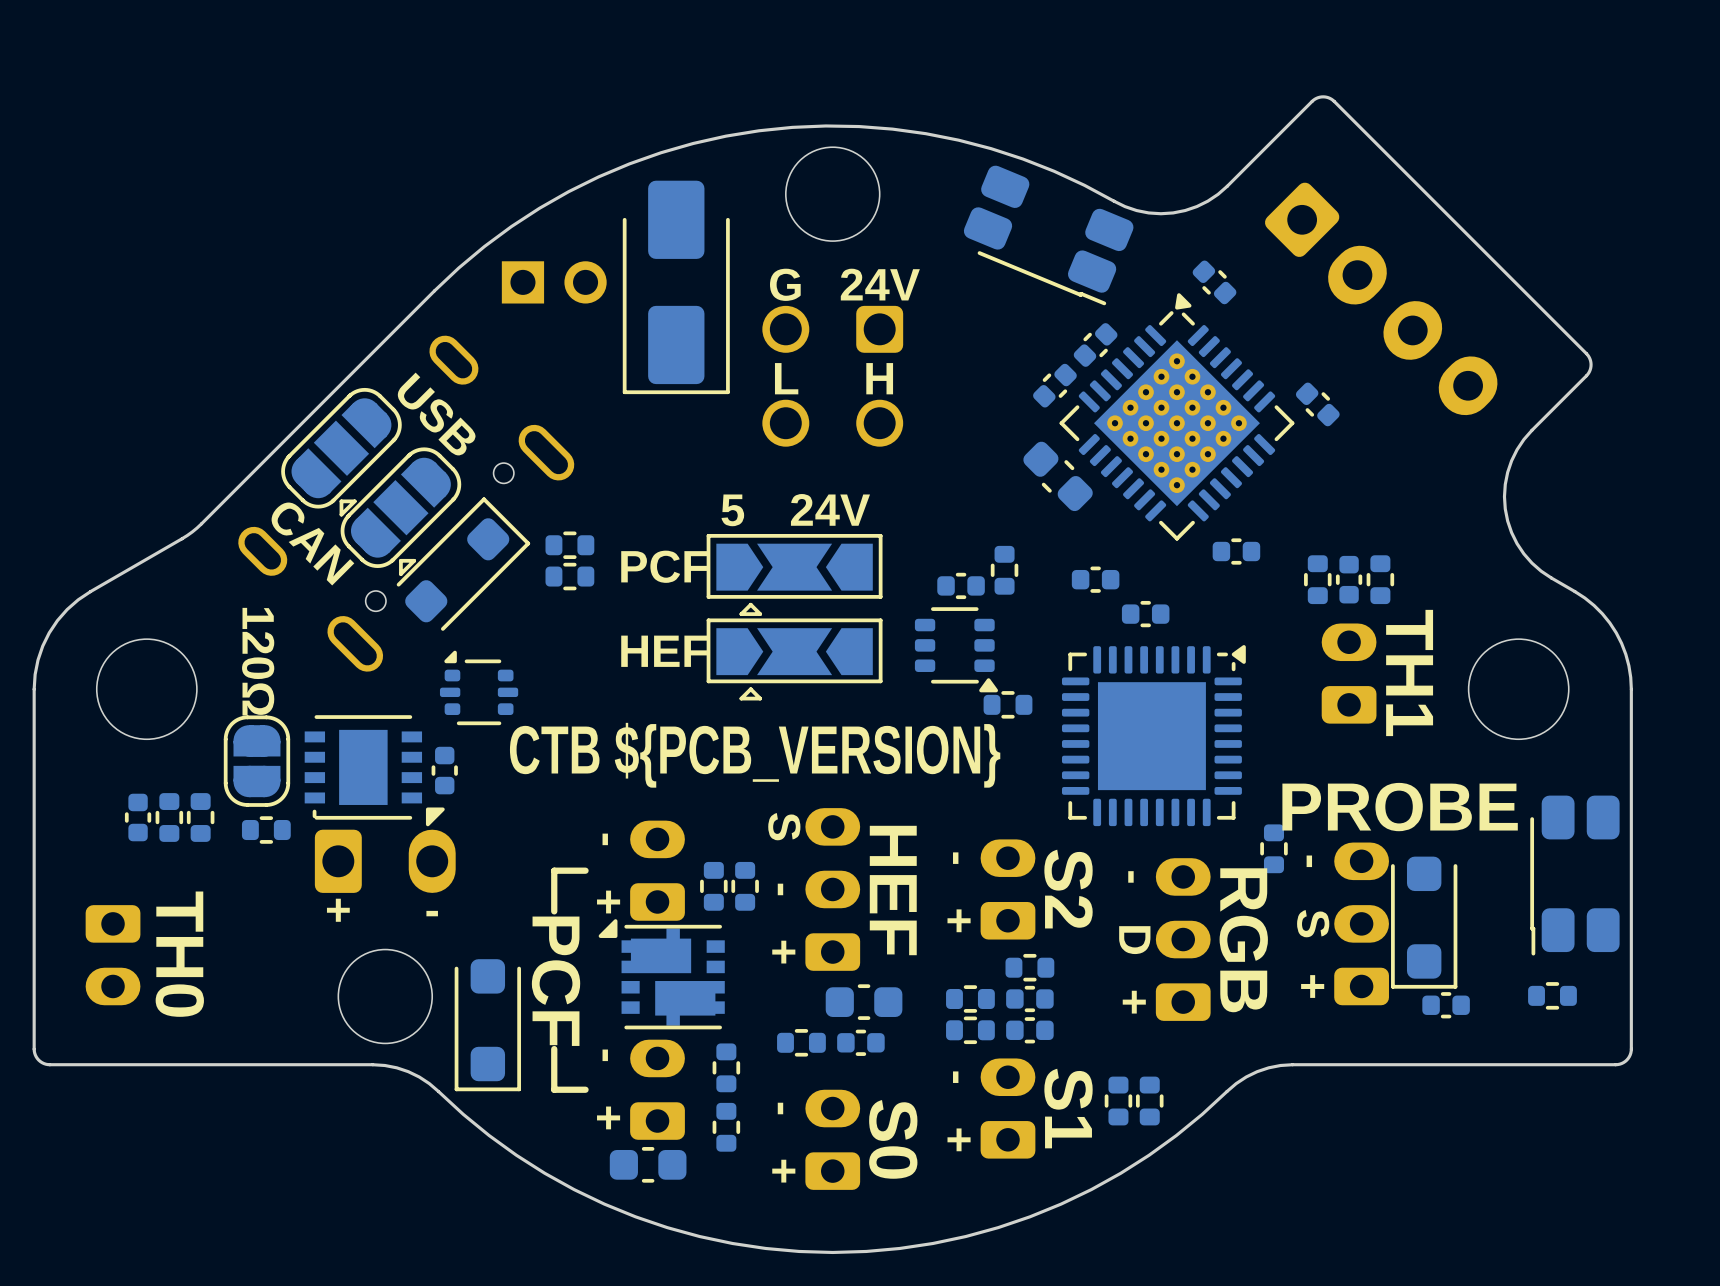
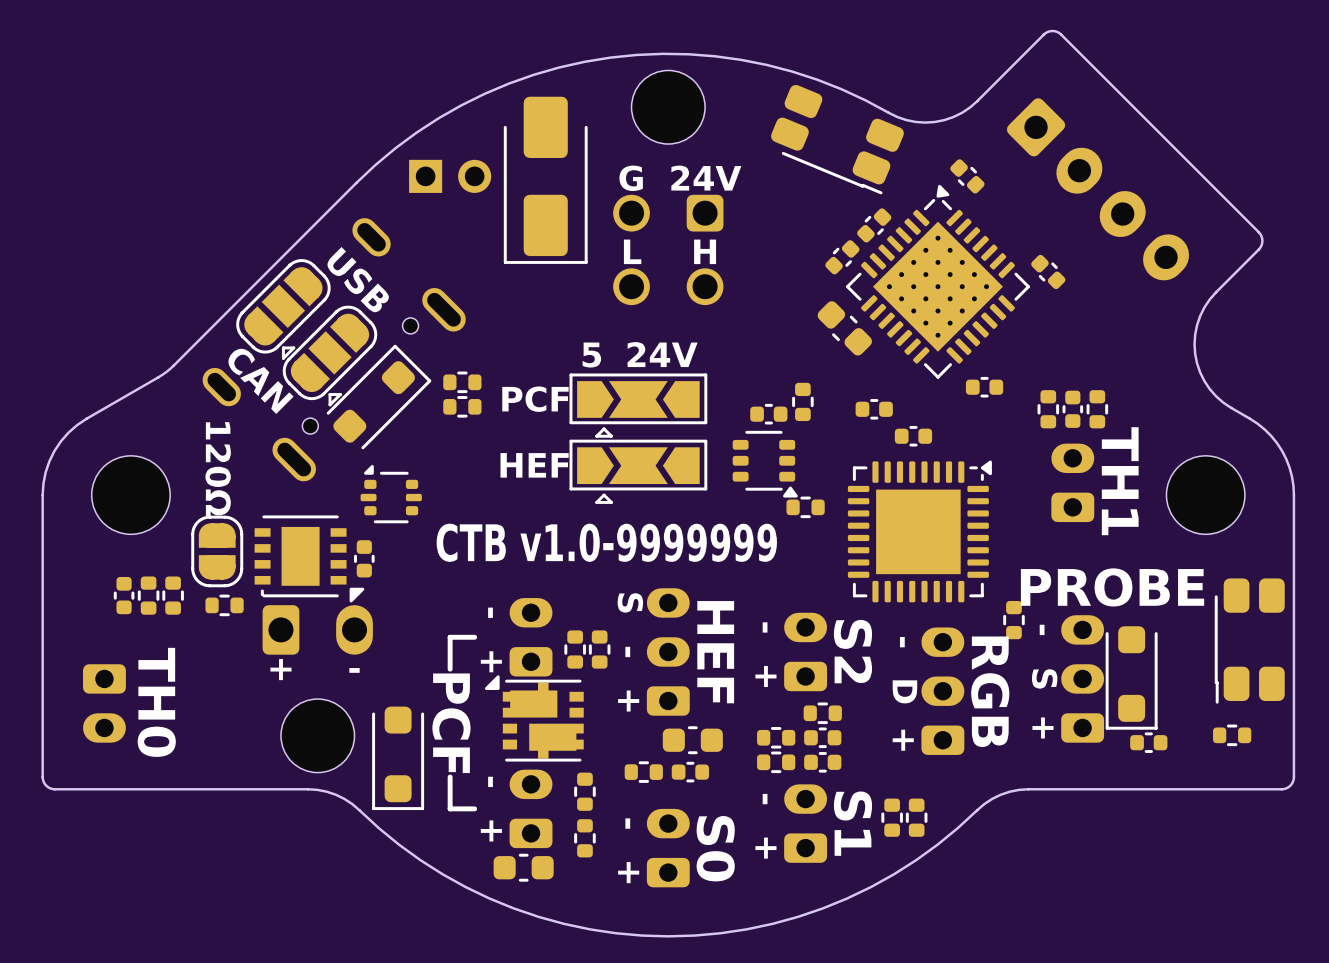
text: CTB ${PCB_VERSION} (755, 755) -> CTB v1.0-9999999 (606, 542)

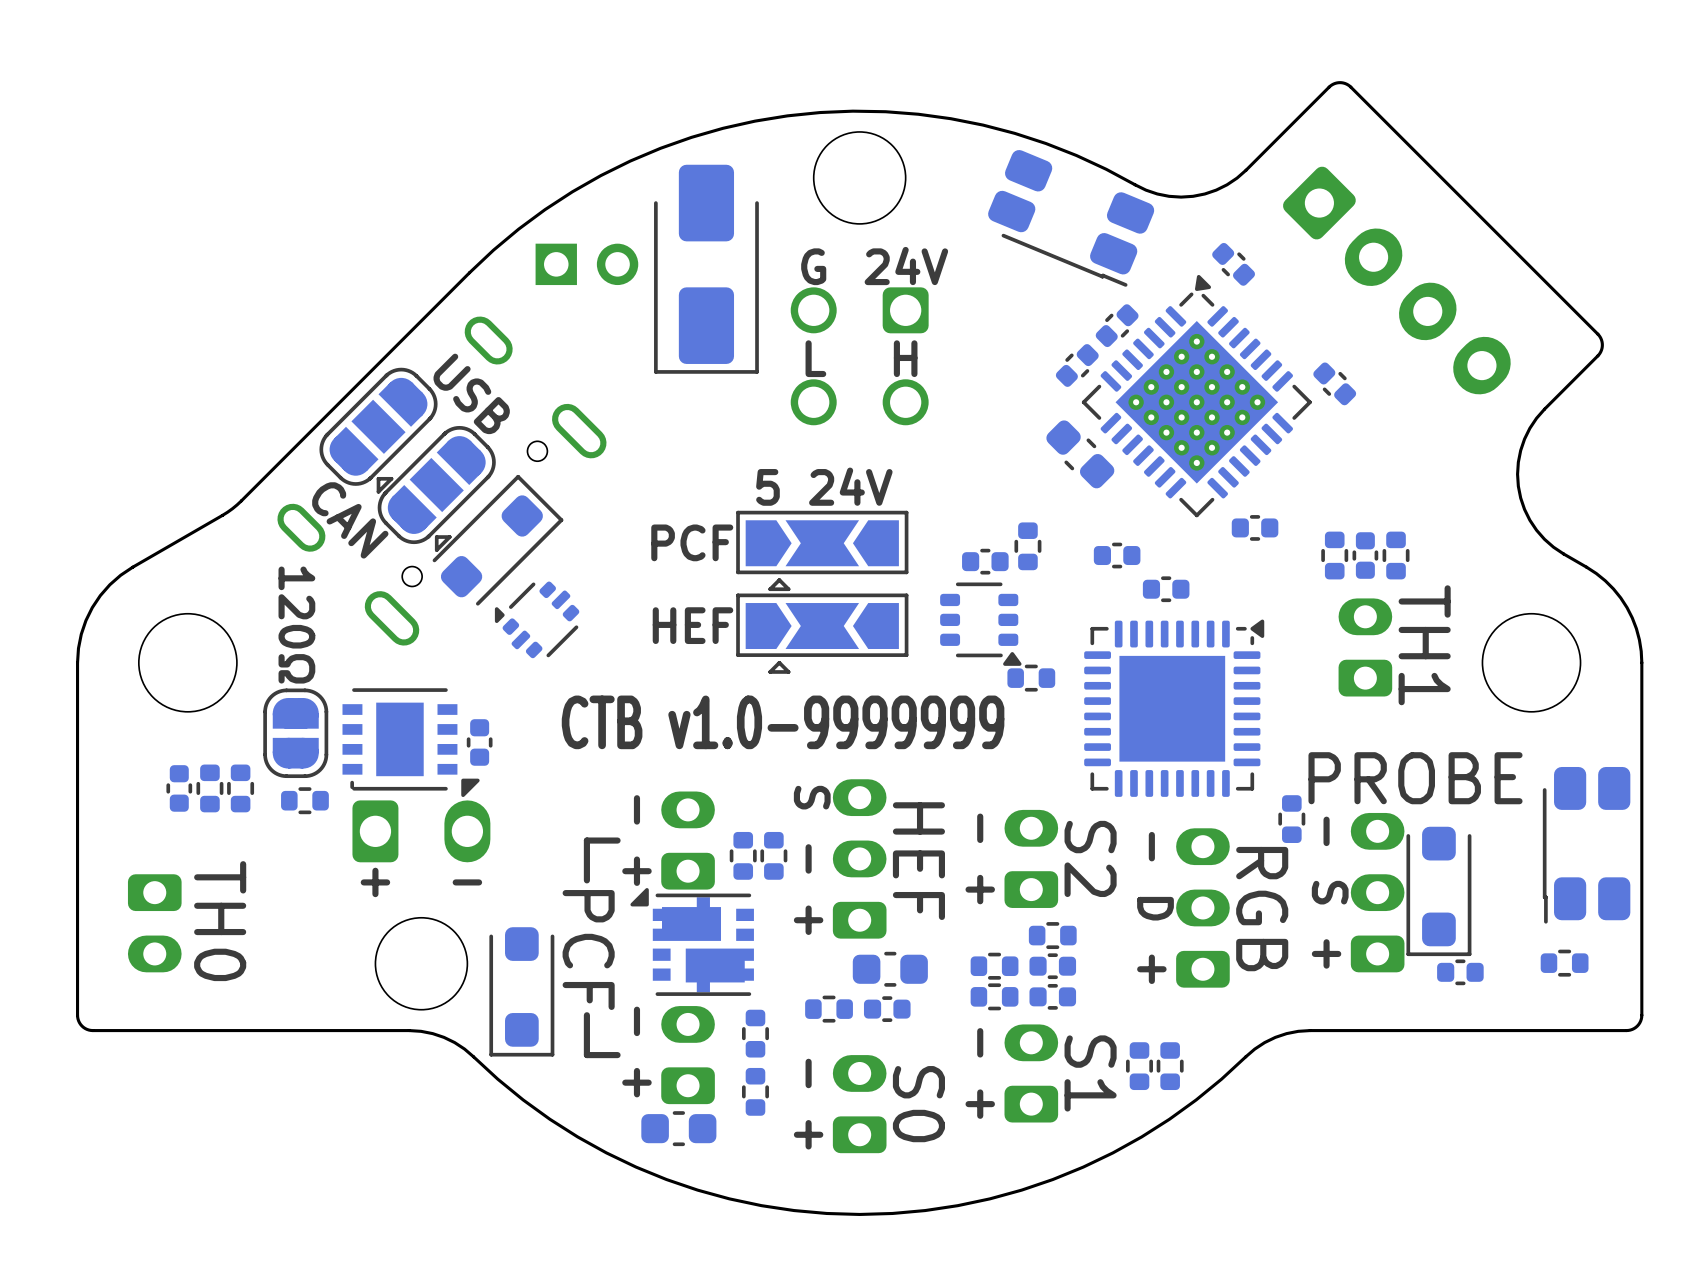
part: (462, 382) -> none
part: (462, 406) -> none
part: none -> (537, 619)
part: (391, 494) -> none

